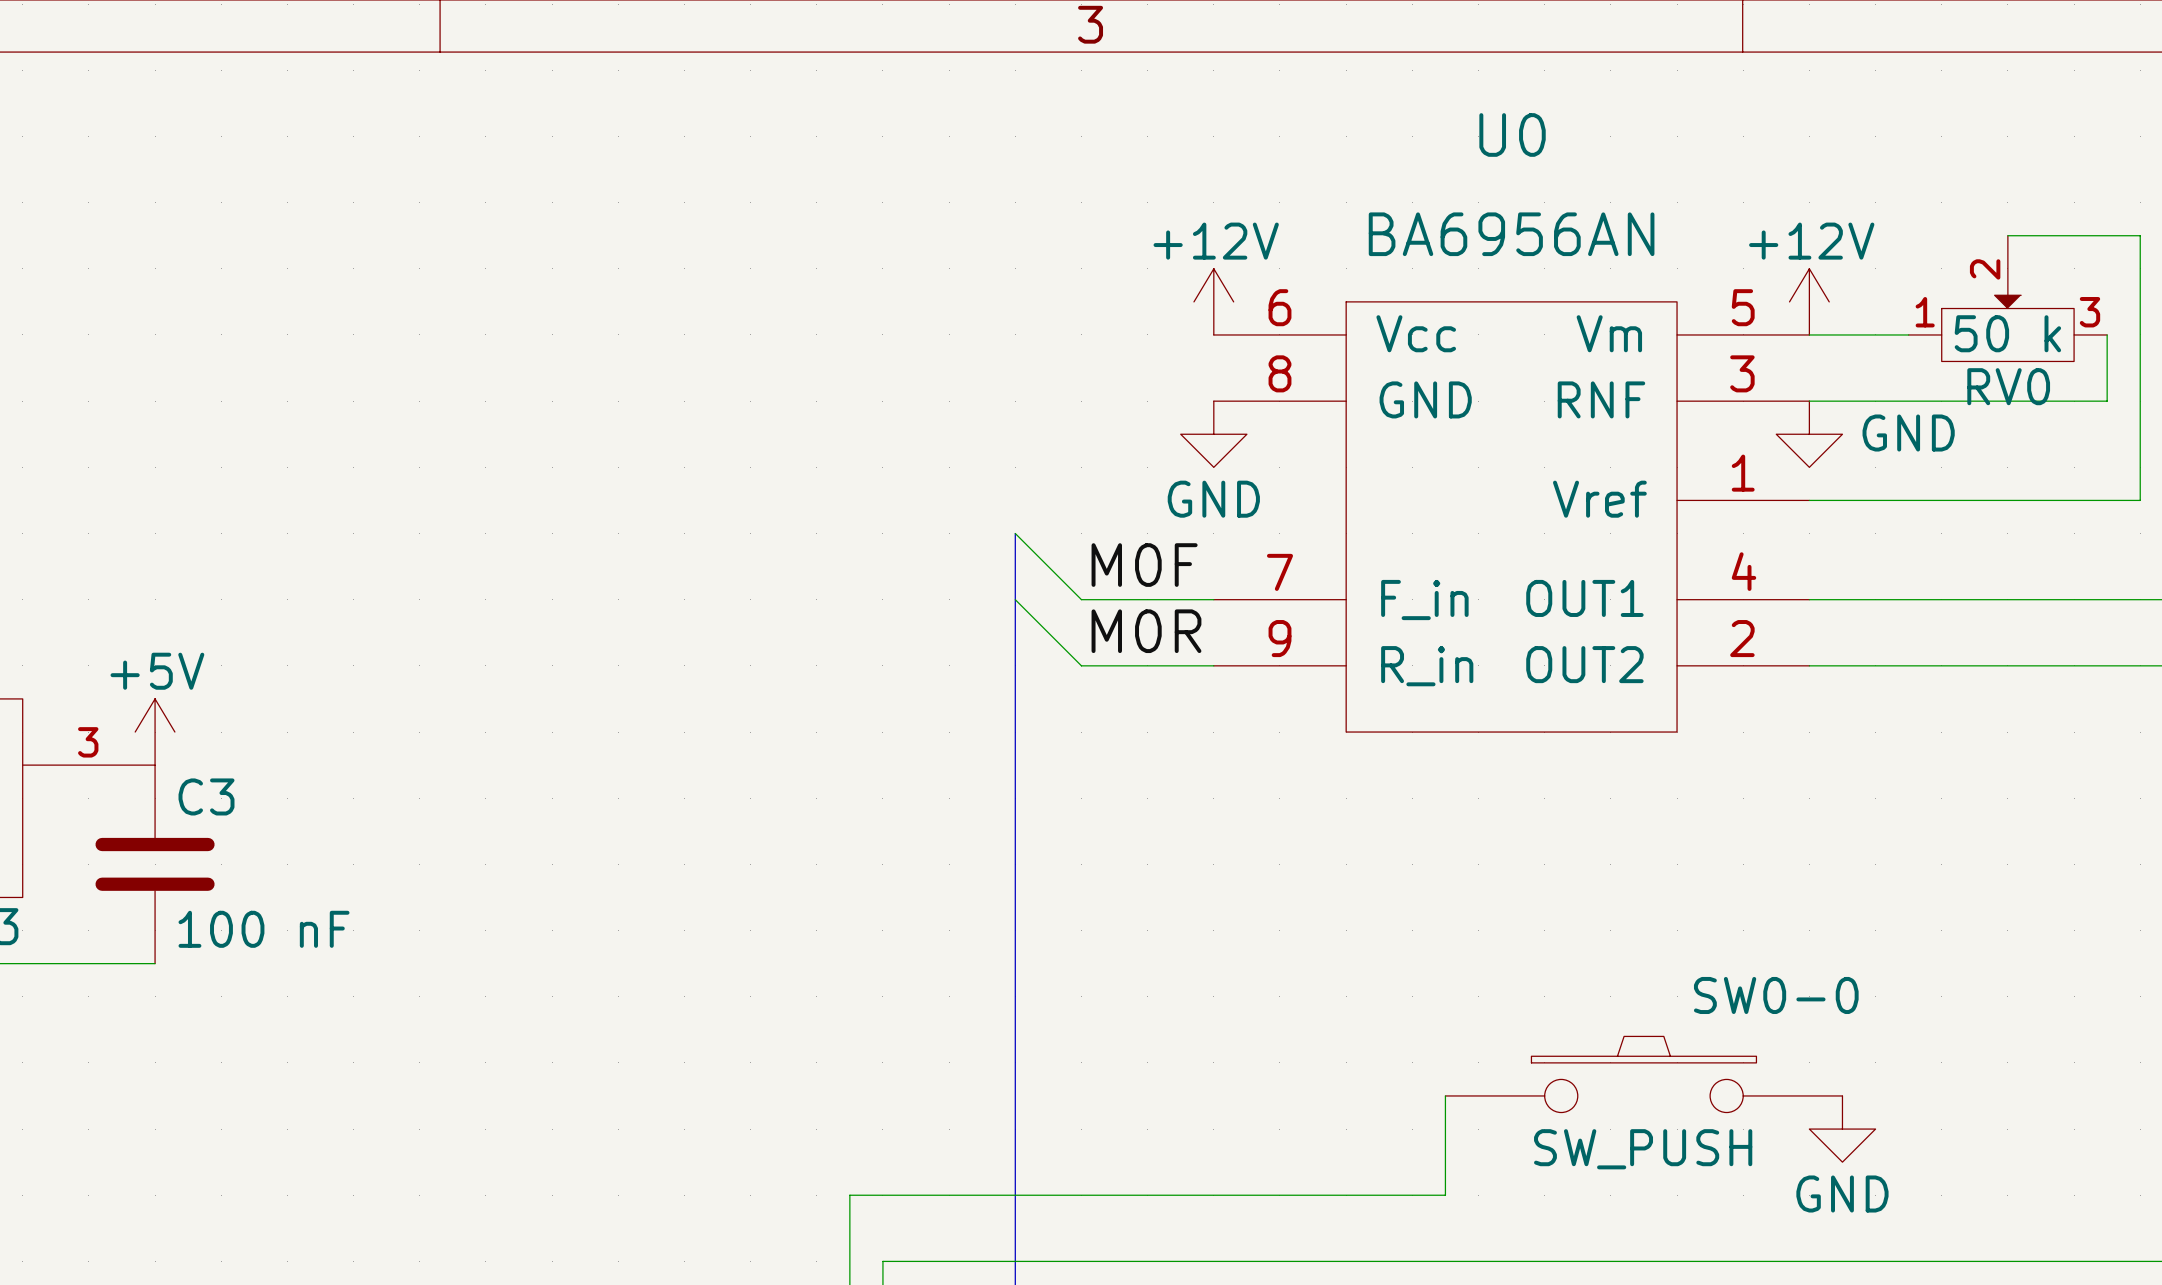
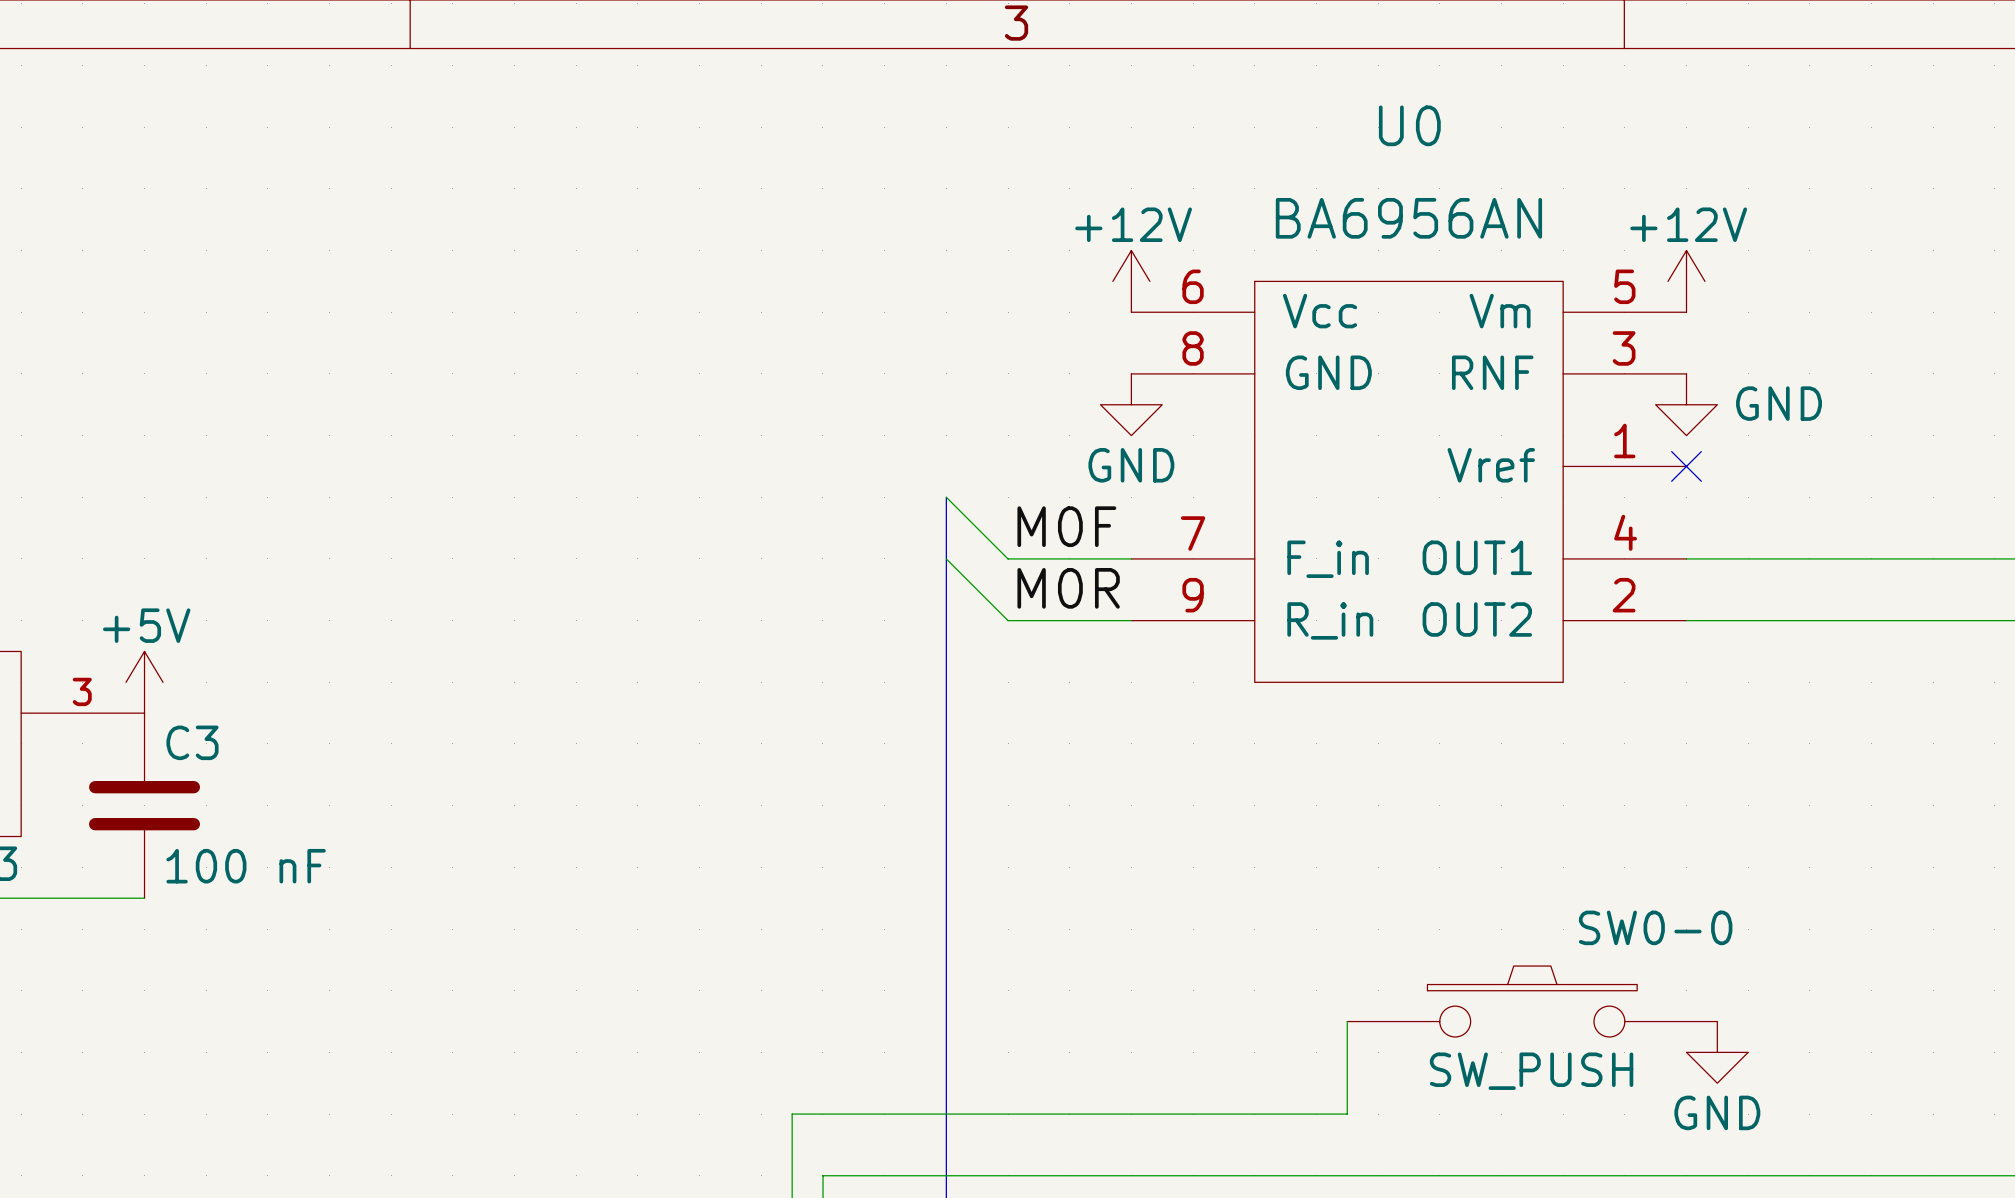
wire: (2007, 235) (2140, 235) (2140, 500) (1809, 500) -> none
RV0: 50 k (2007, 298) -> none
wire: (1809, 334) (1908, 334) -> none
wire: (2107, 334) (2107, 401) (1809, 401) -> none
no-connect mark: none -> (1686, 466)

